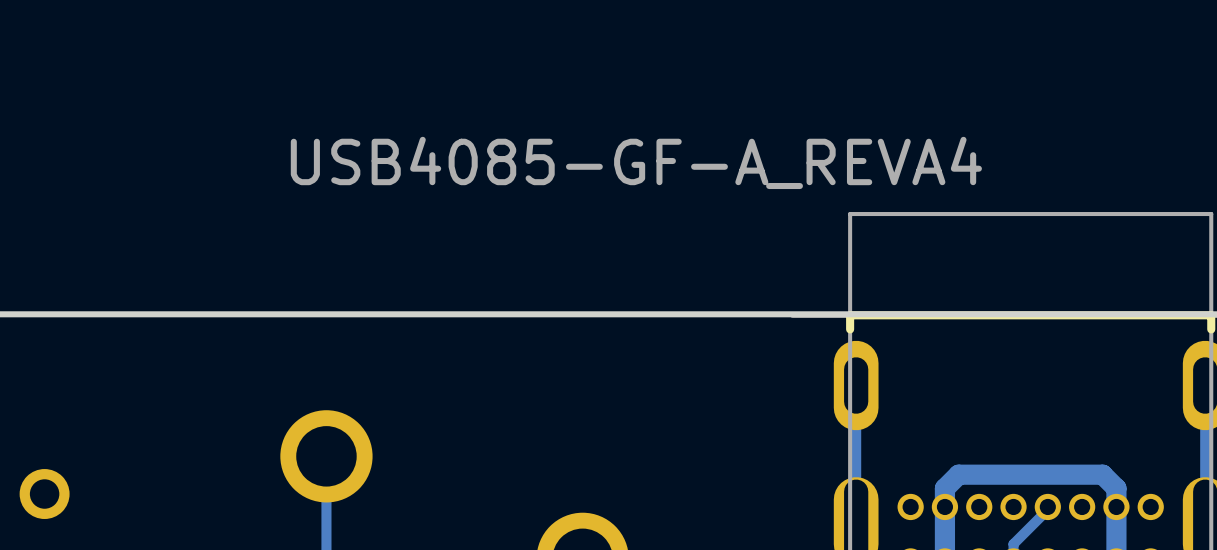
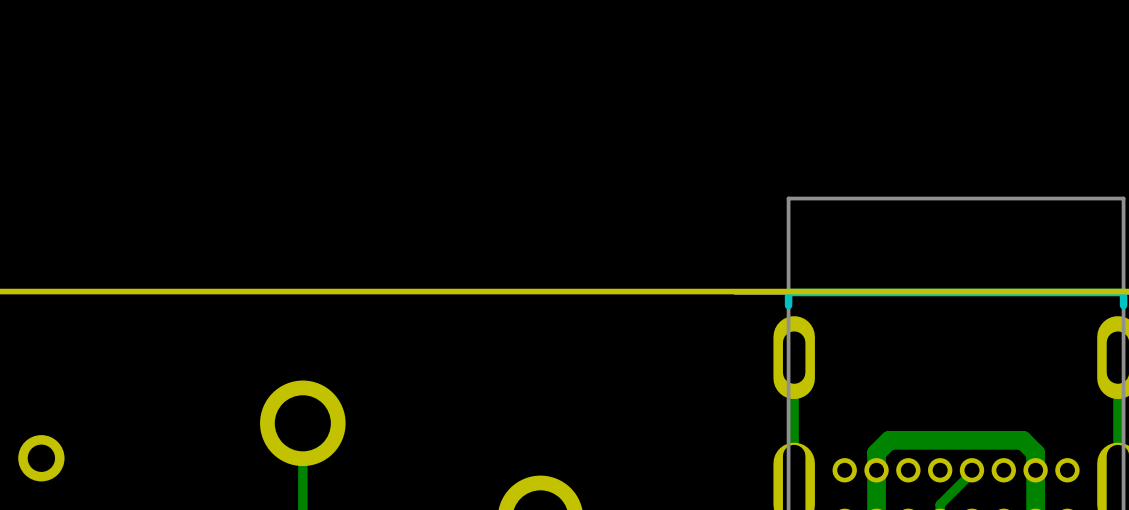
part value: USB4085-GF-A_REVA4 (636, 162) -> none

